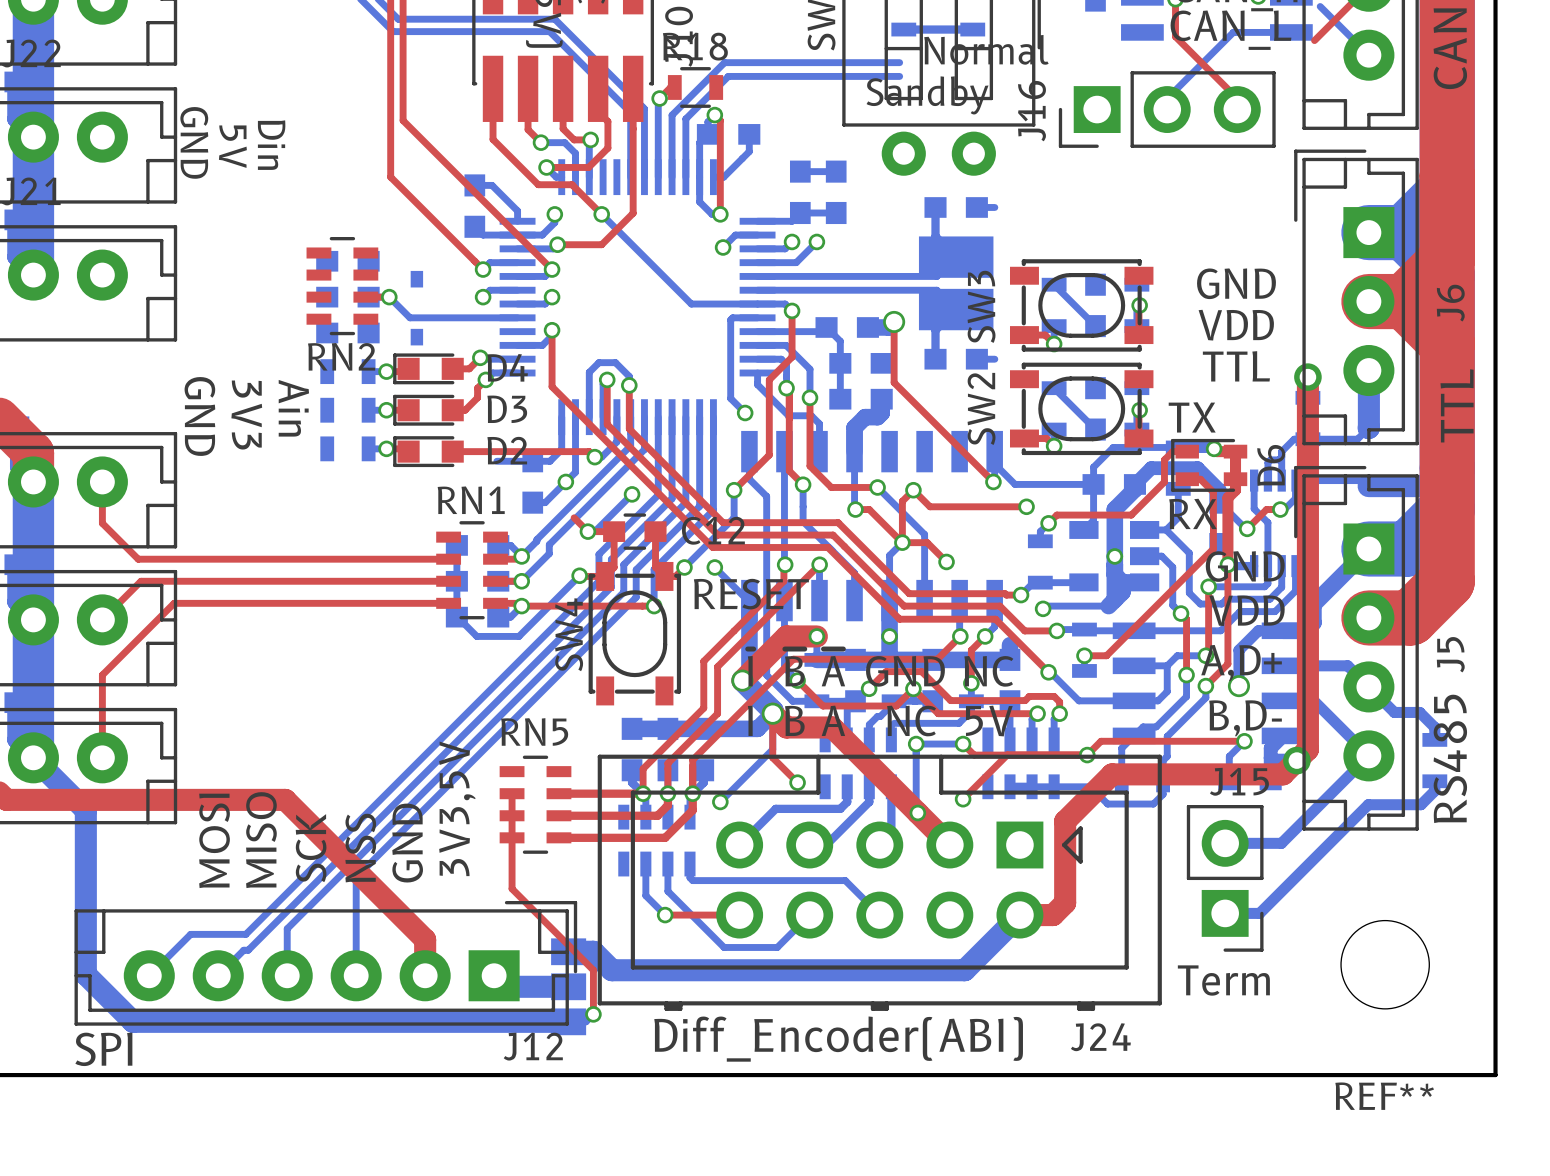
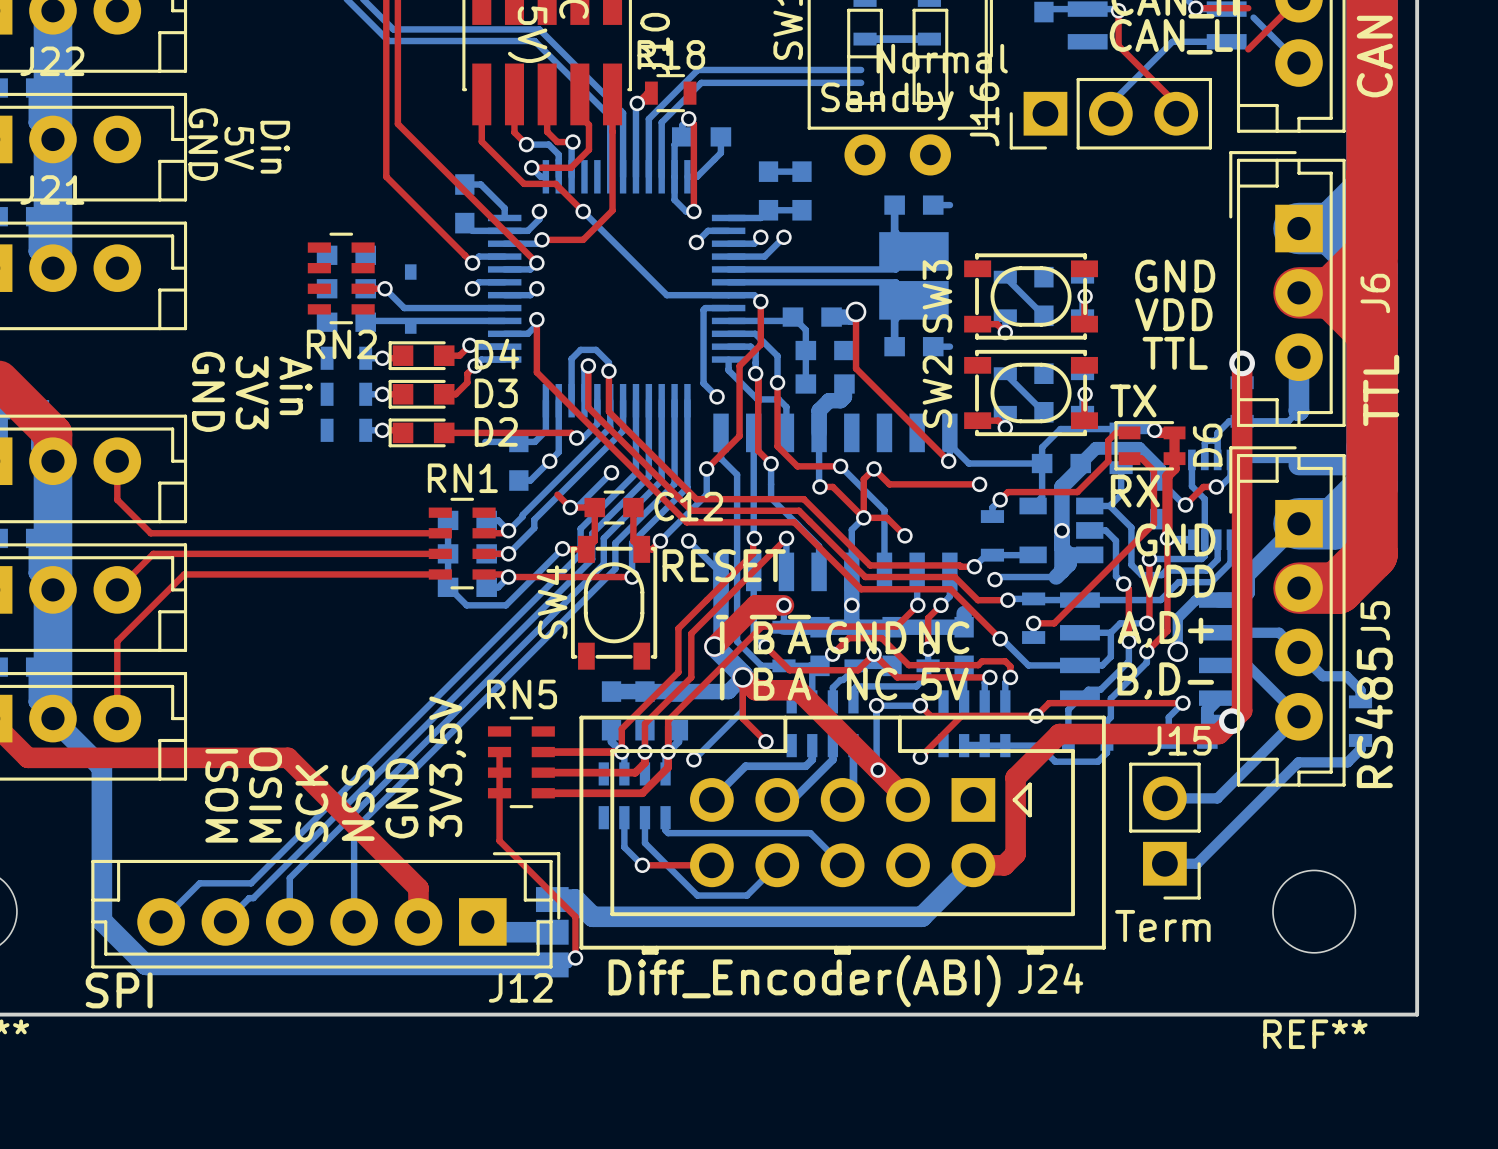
bottom track: none -> (366, 320) (504, 320)

